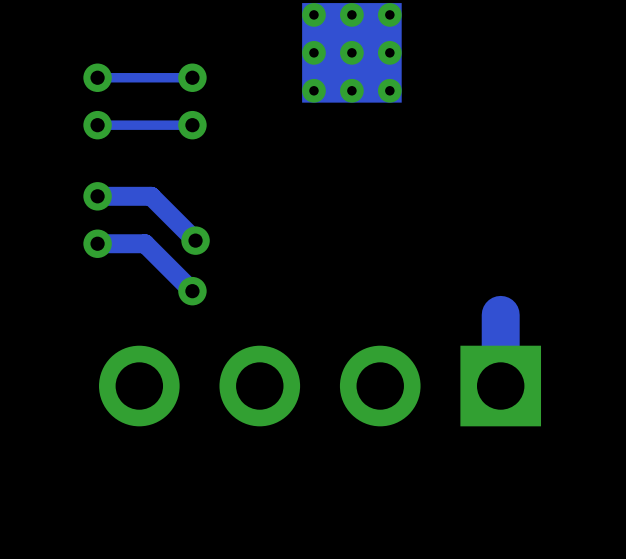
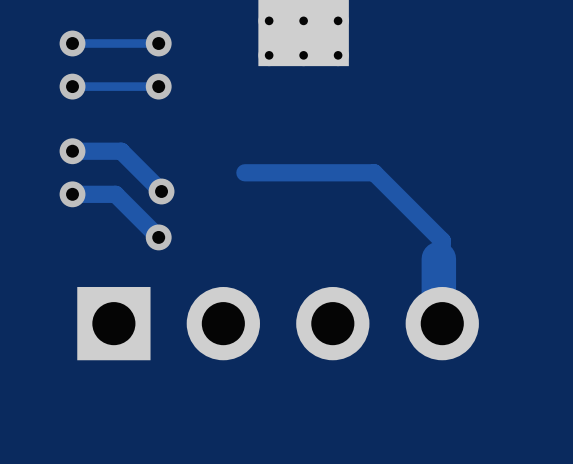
track: none -> (244, 172) (374, 172) (442, 240) (442, 323)
part rotation: 0° (320, 386) -> 180° (278, 323)

